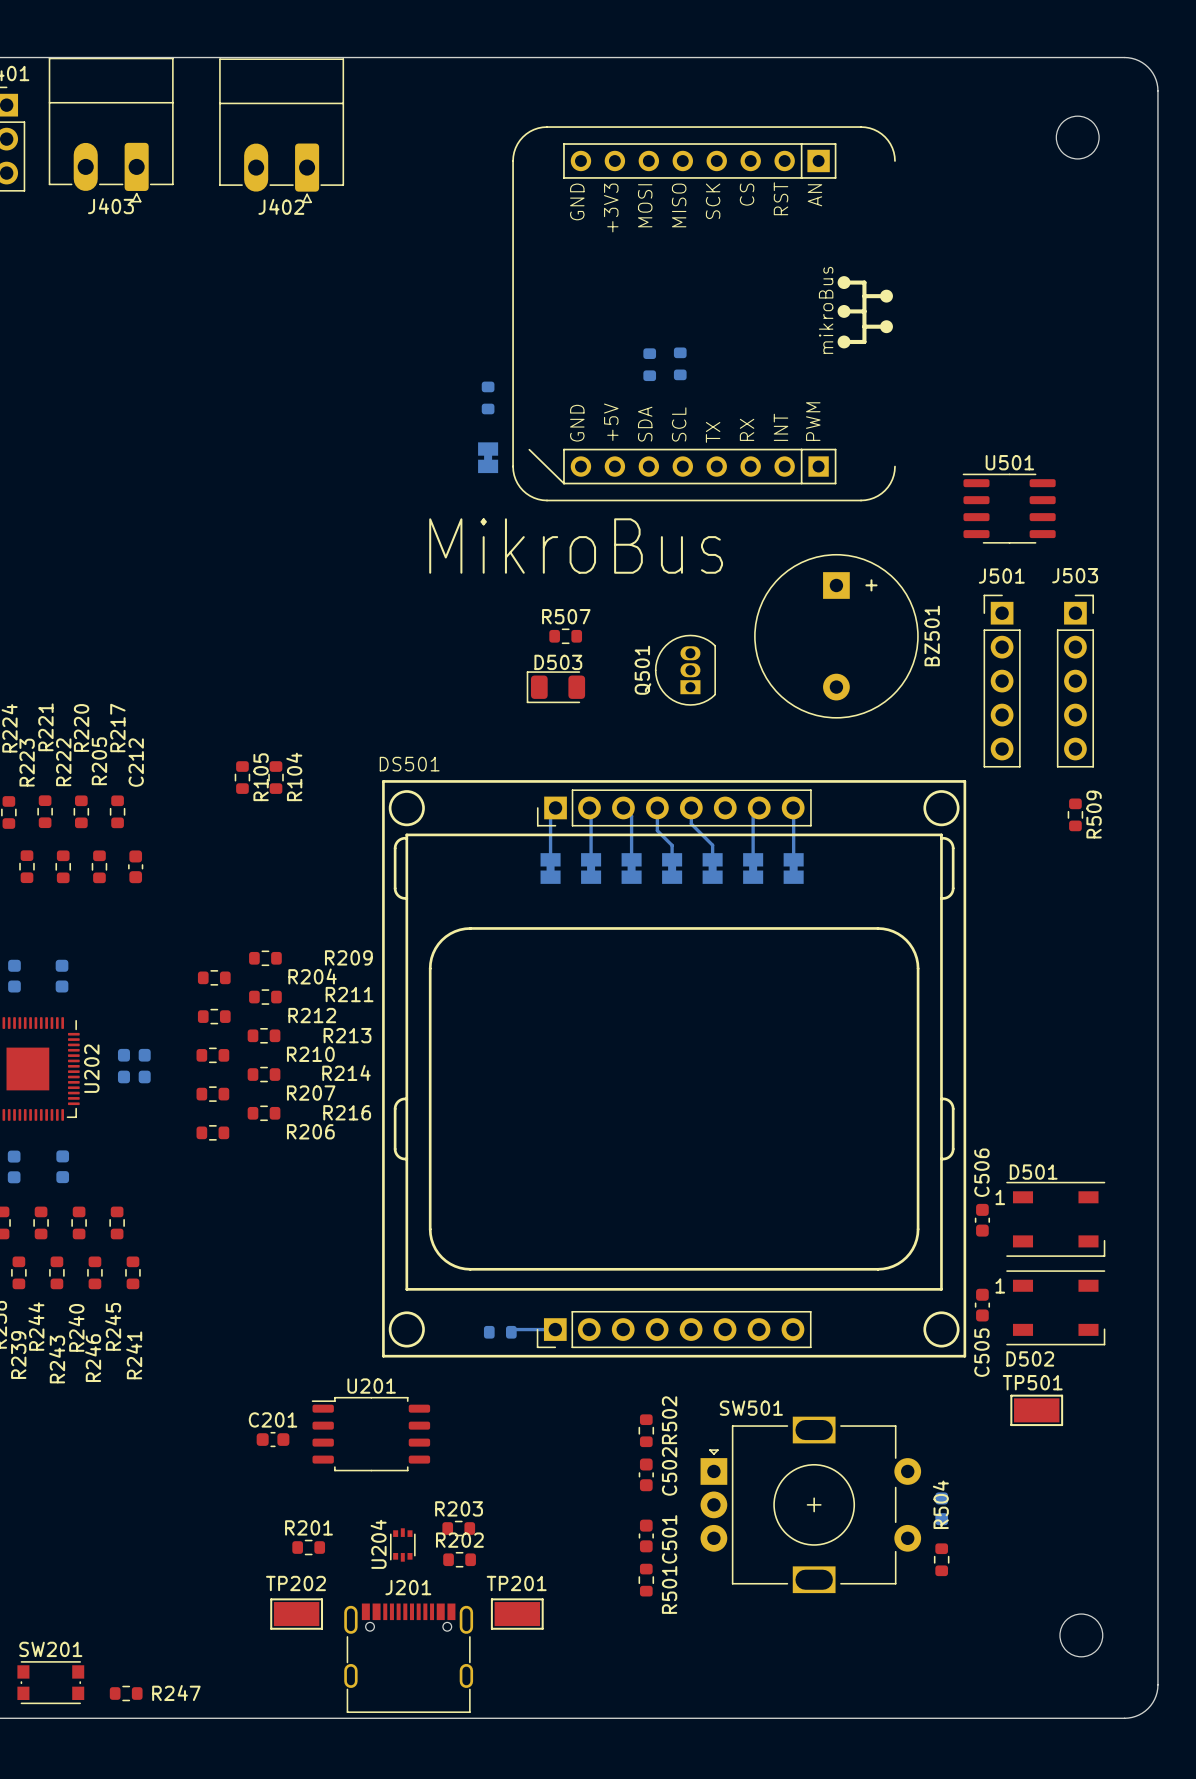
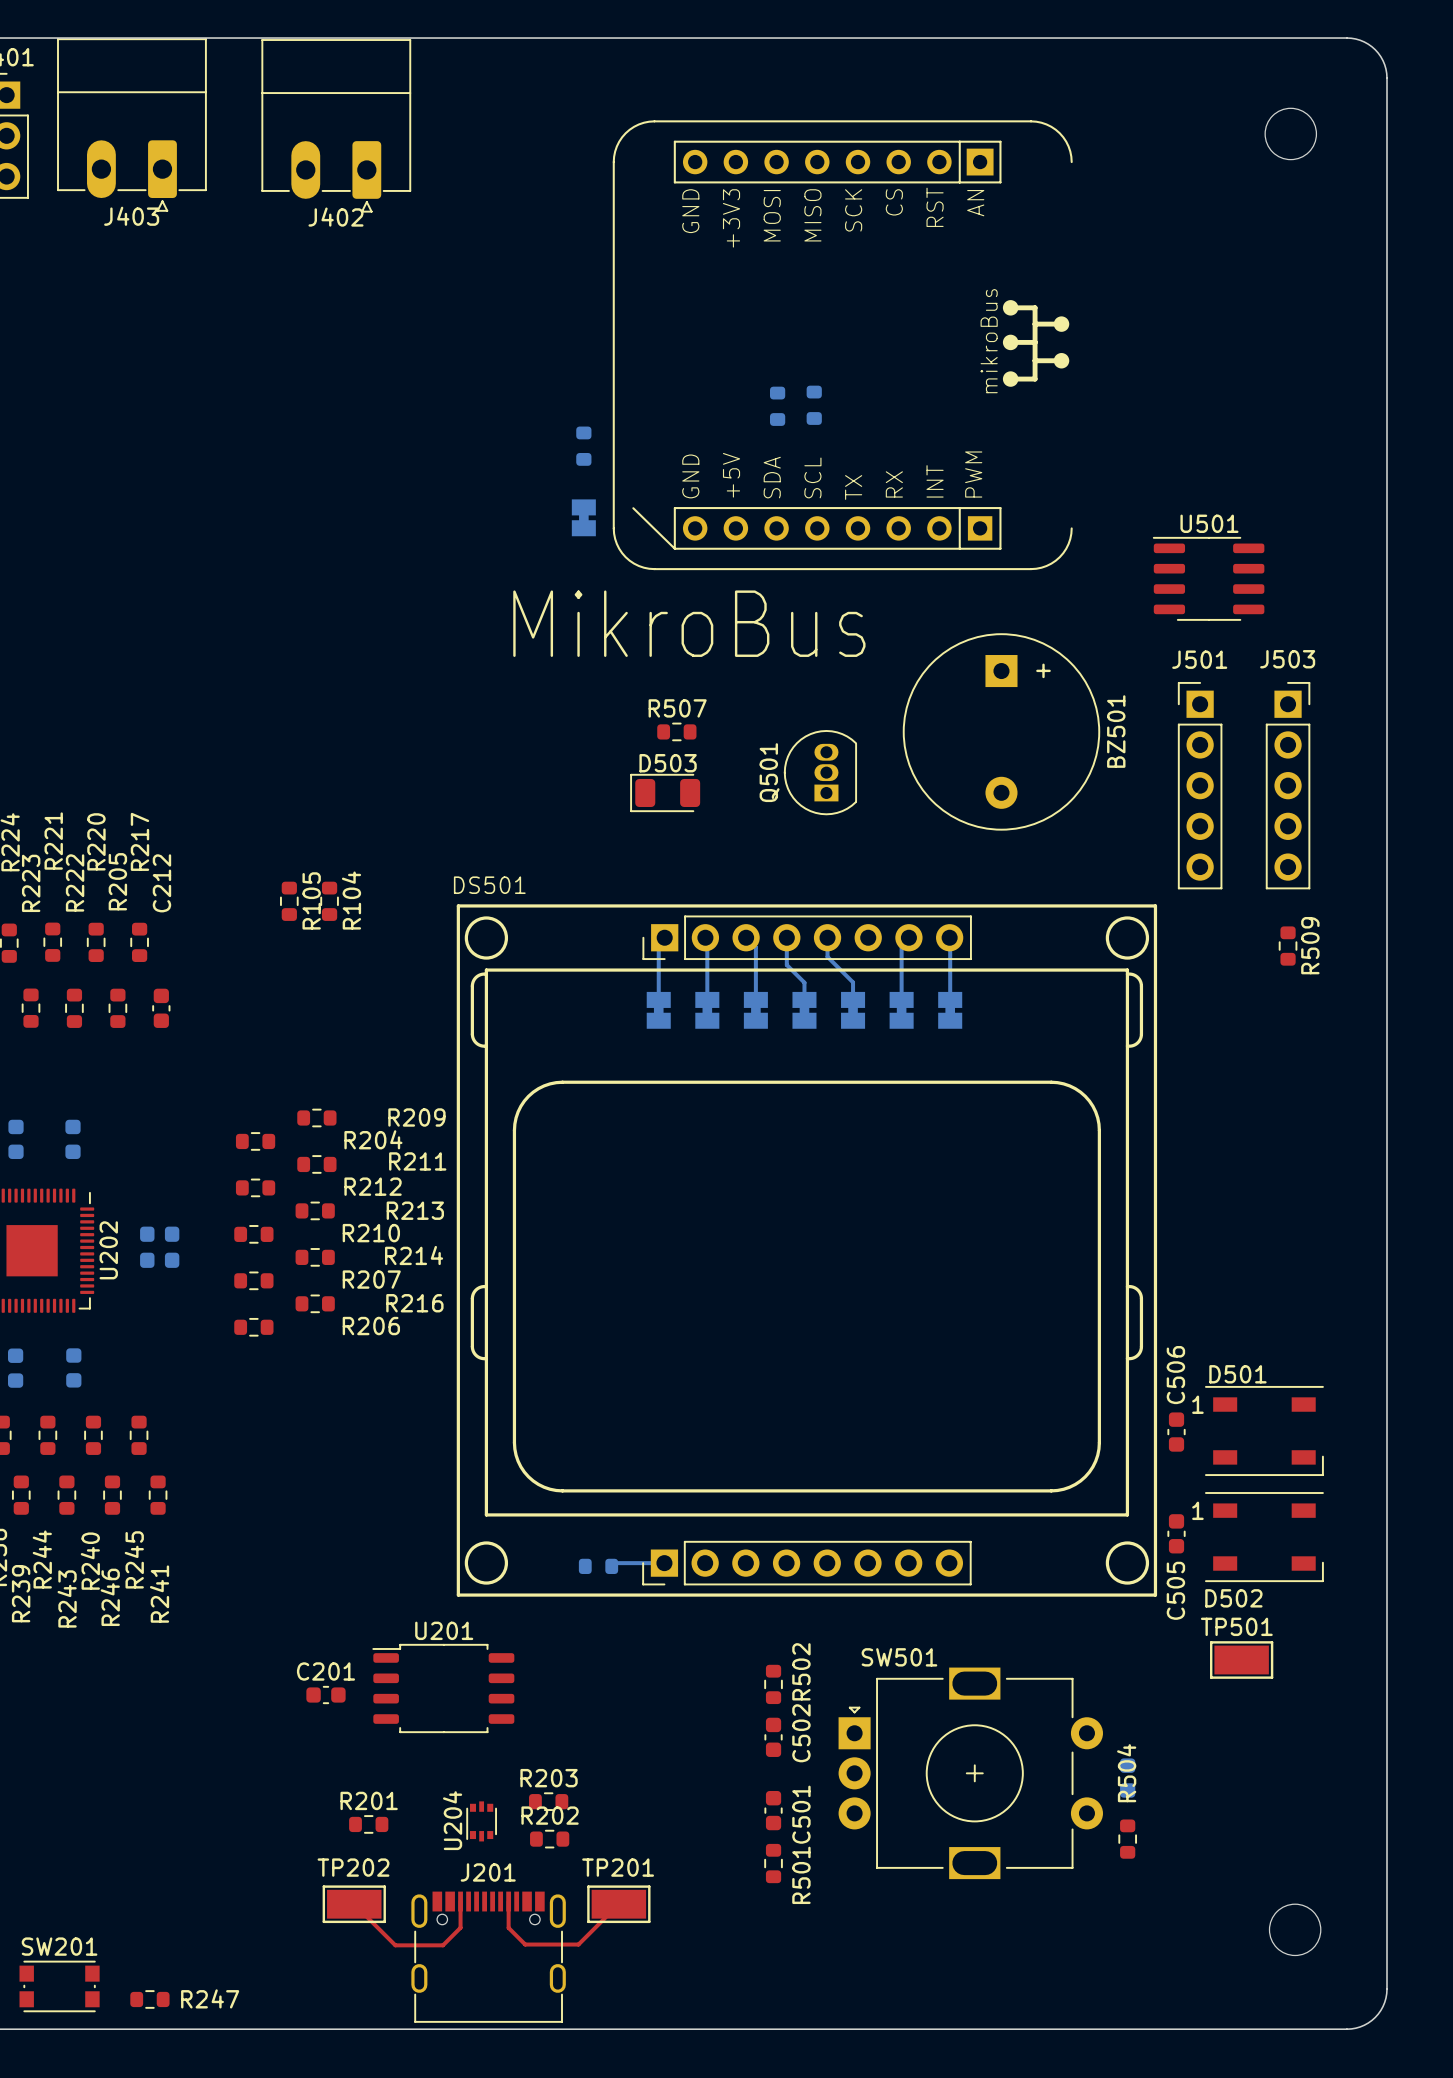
top track: none -> (460, 1901) (460, 1927) (443, 1945) (395, 1945) (354, 1904)
top track: none -> (508, 1901) (508, 1927) (525, 1944) (578, 1944) (618, 1904)

